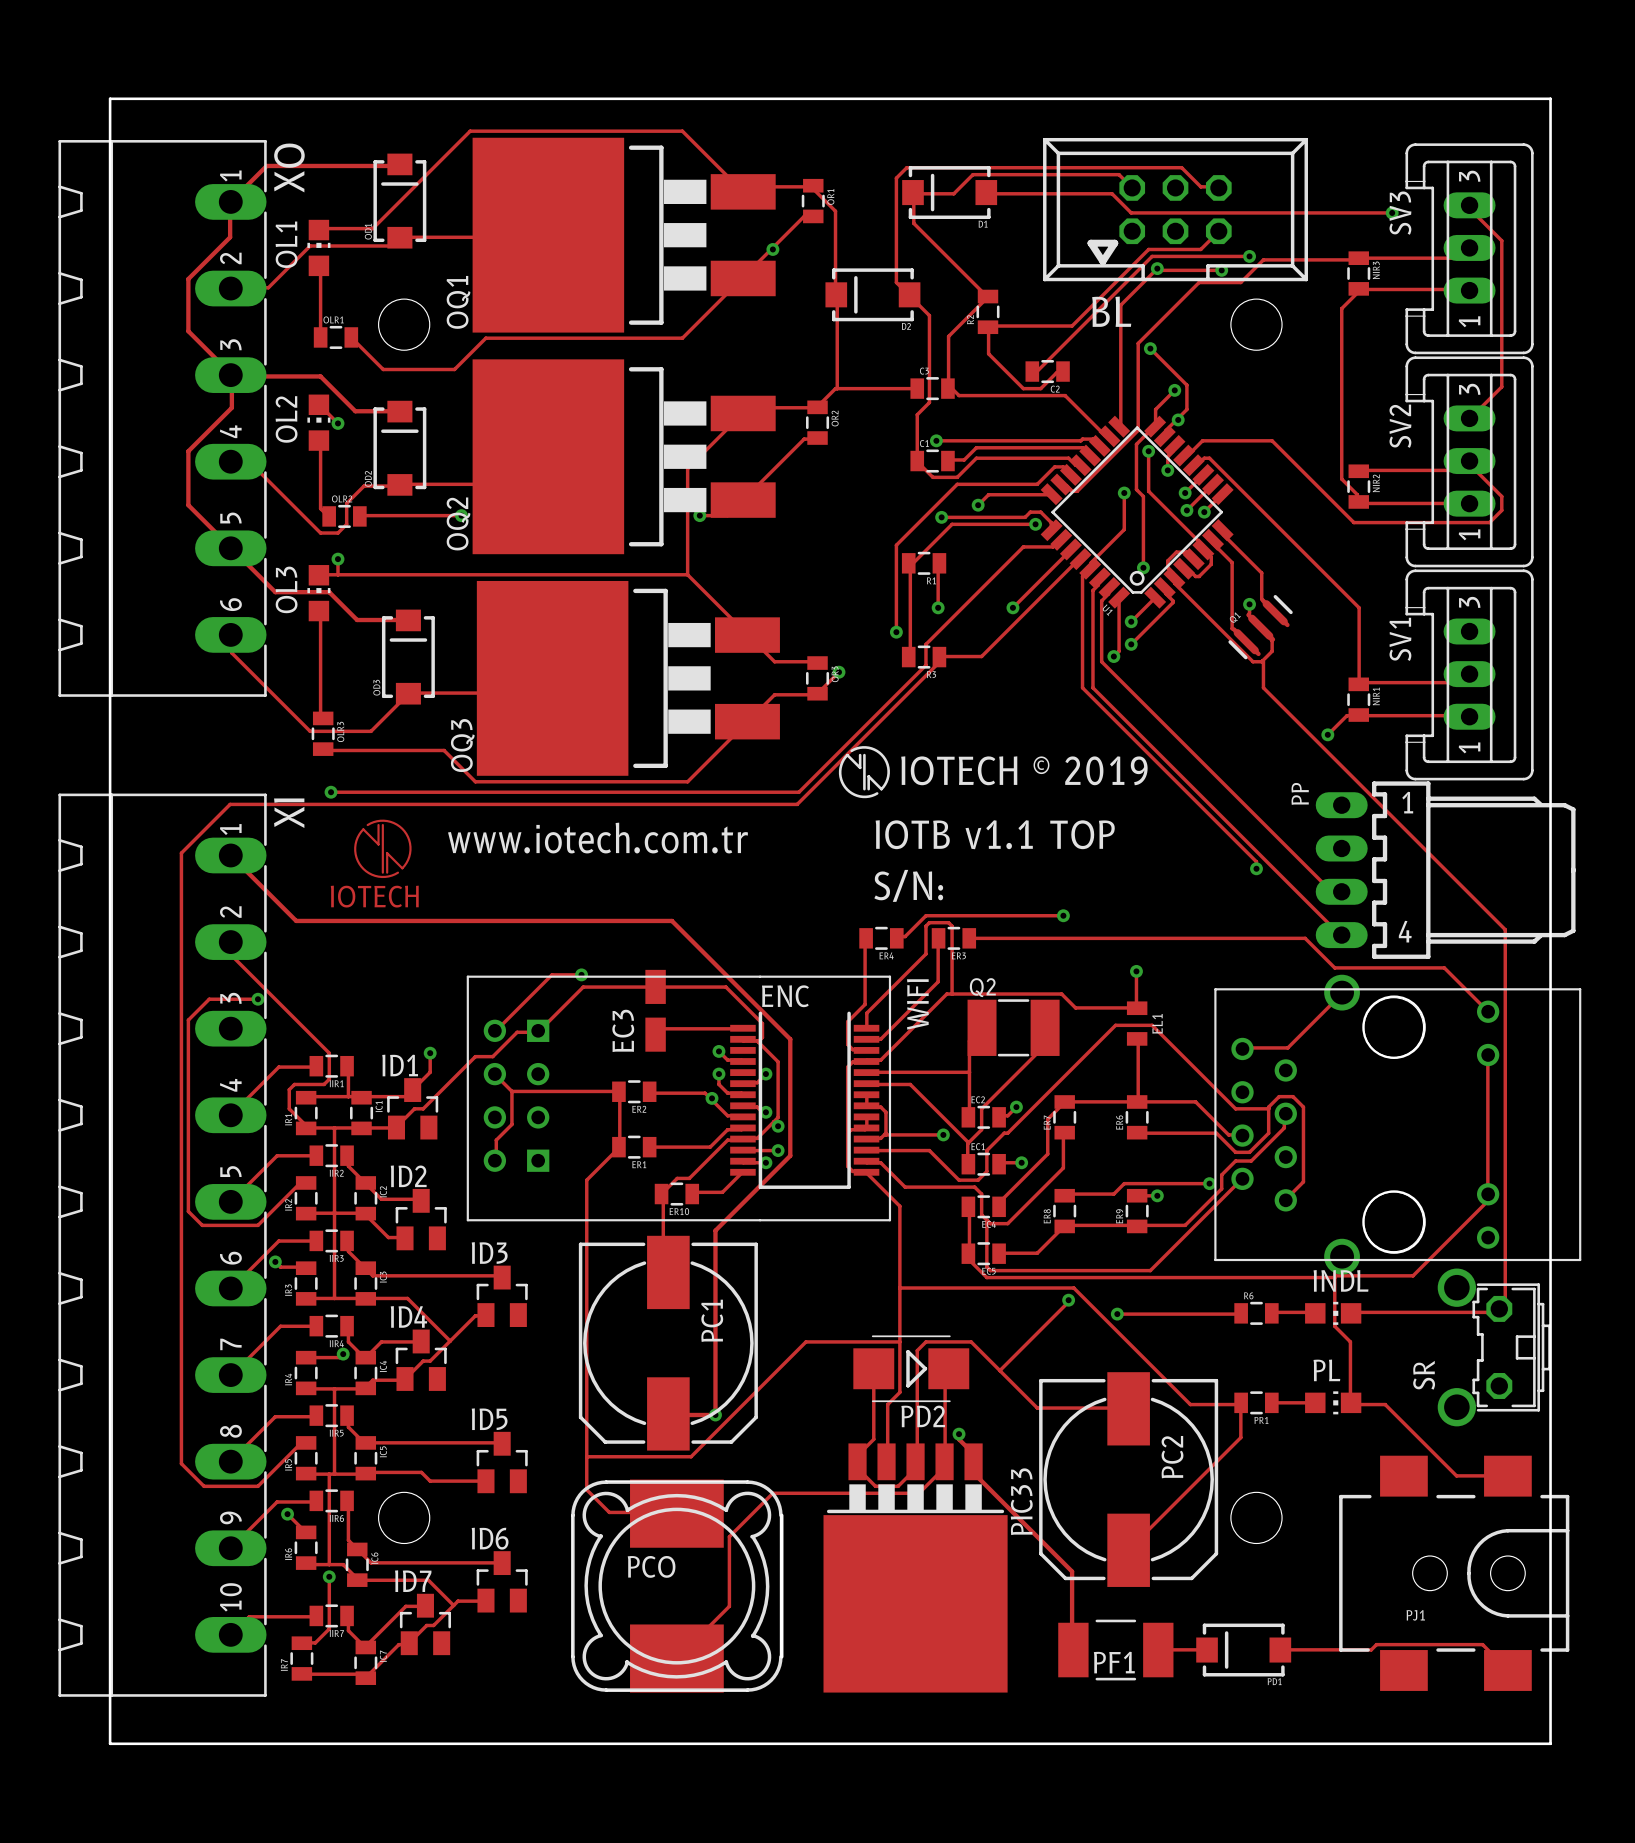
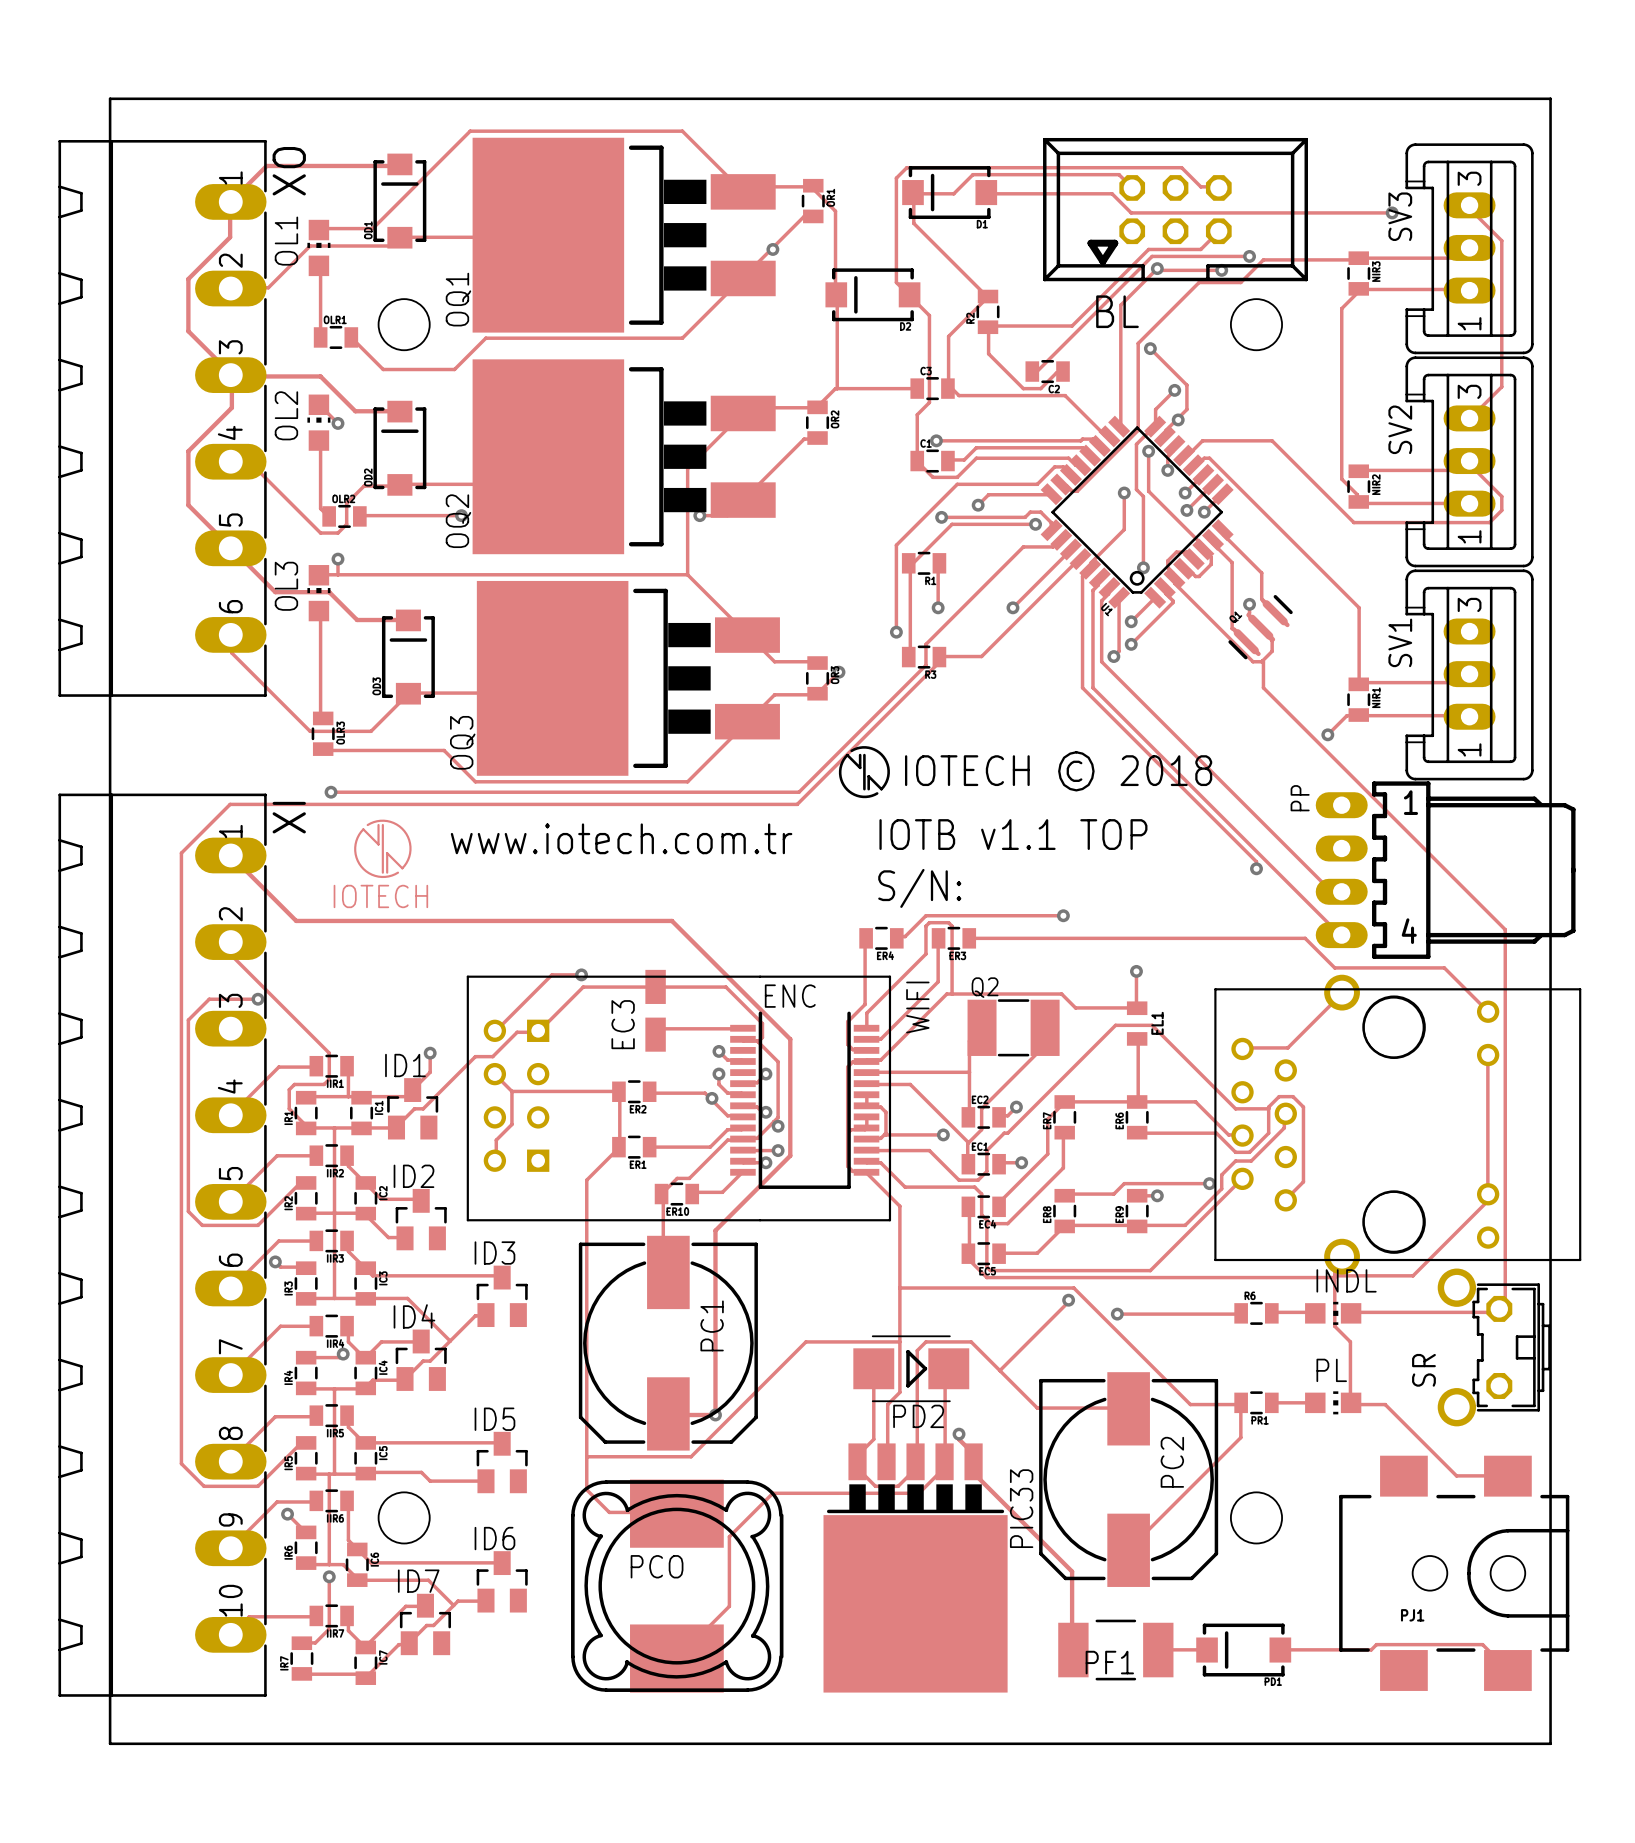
text: IOTECH © 2019 (1024, 770) -> IOTECH © 2018 (1058, 771)

